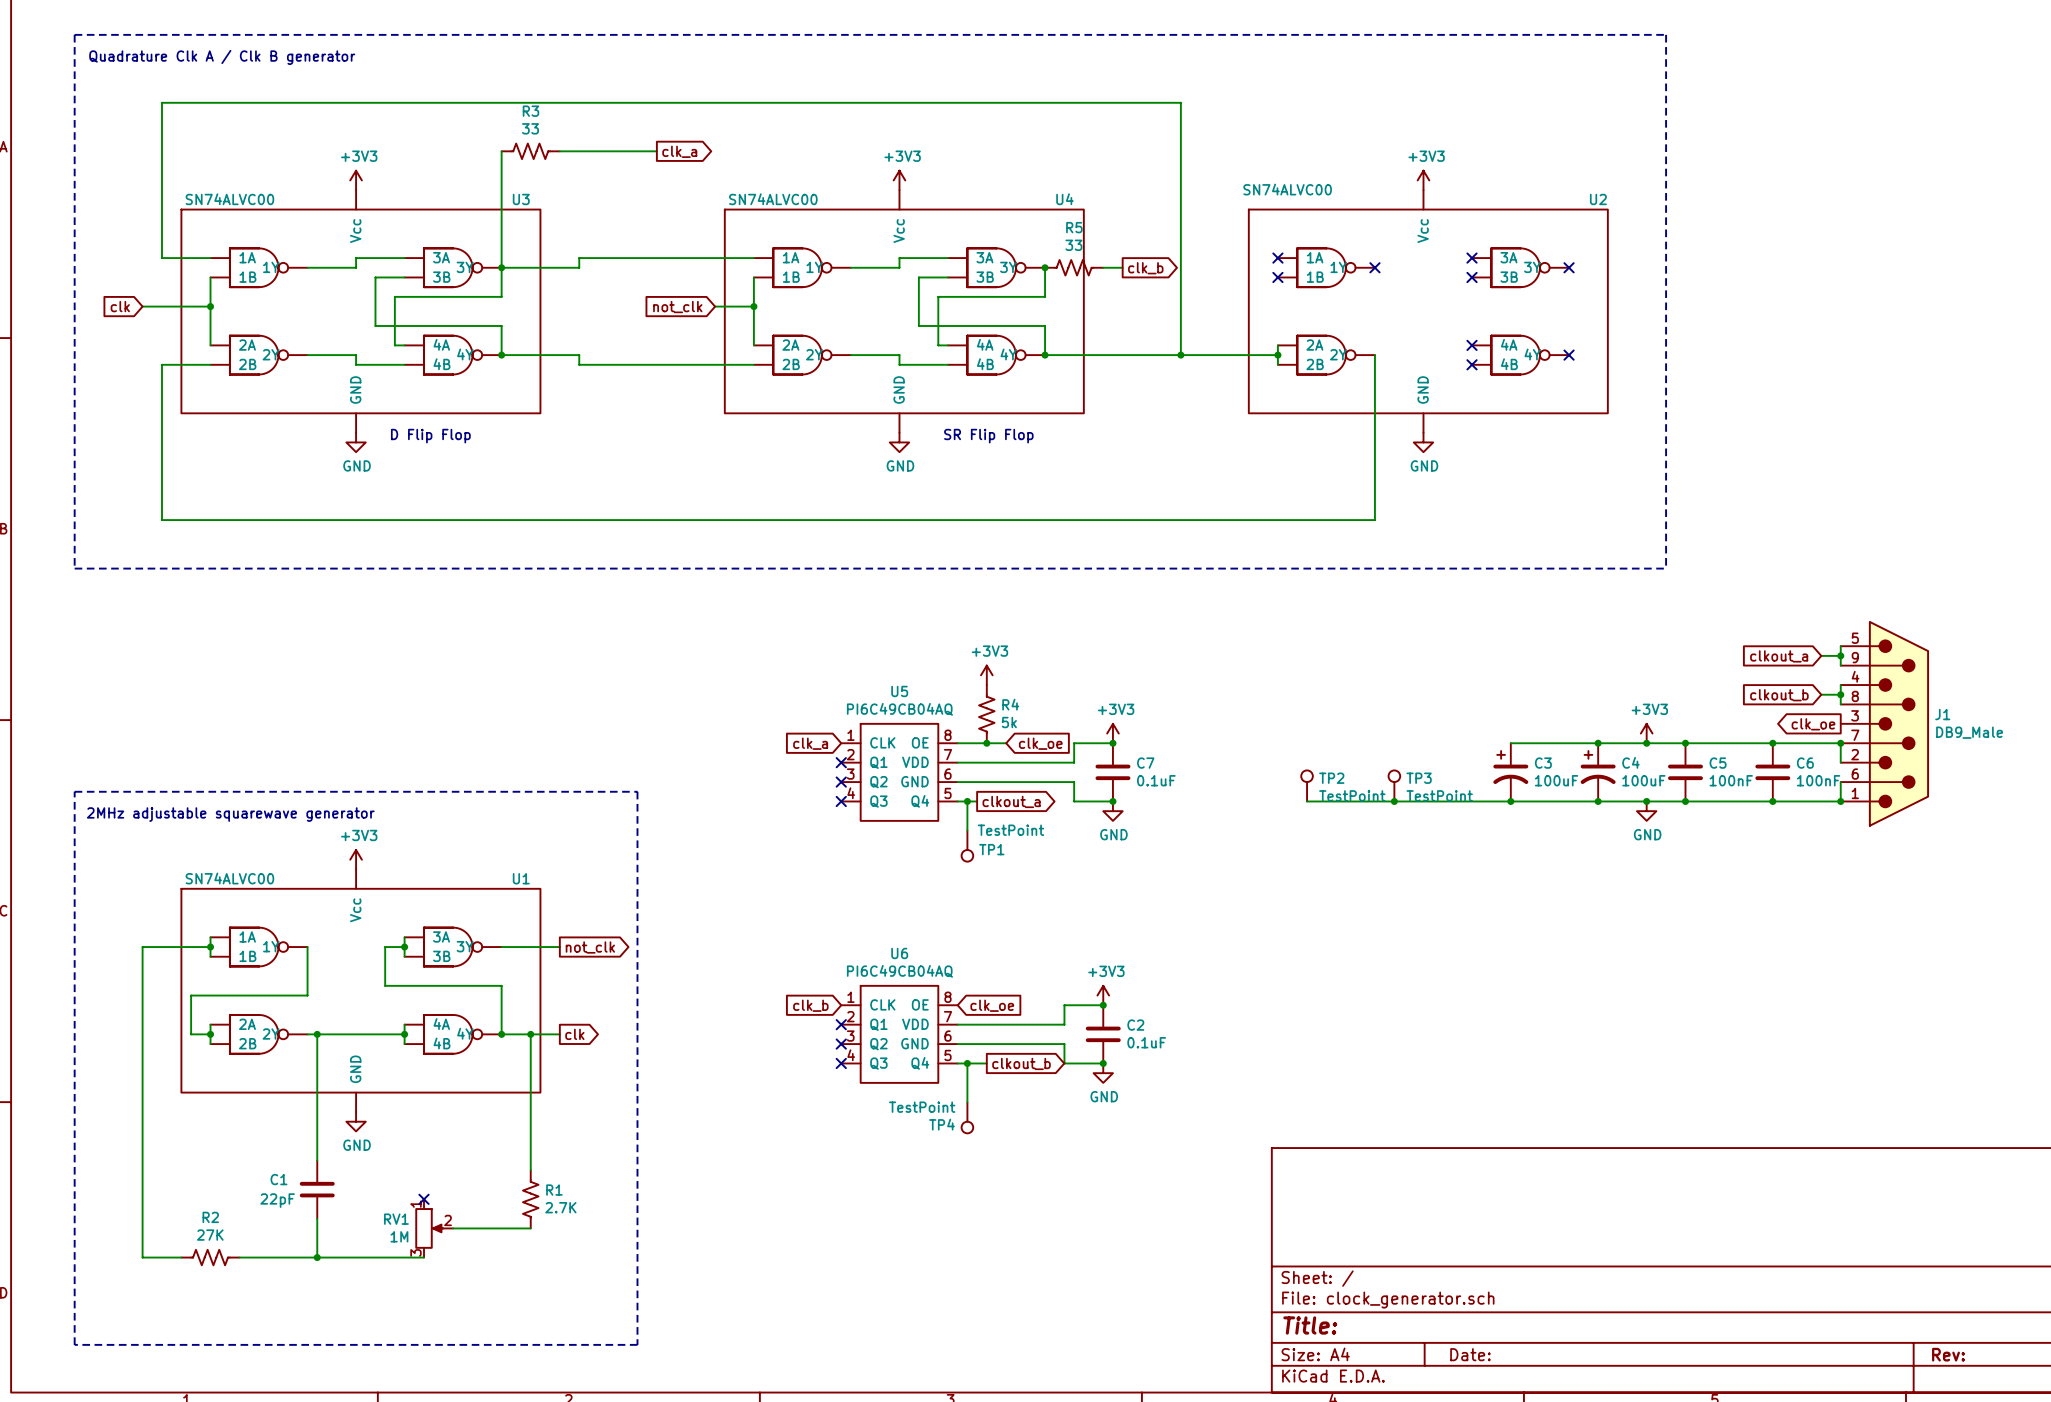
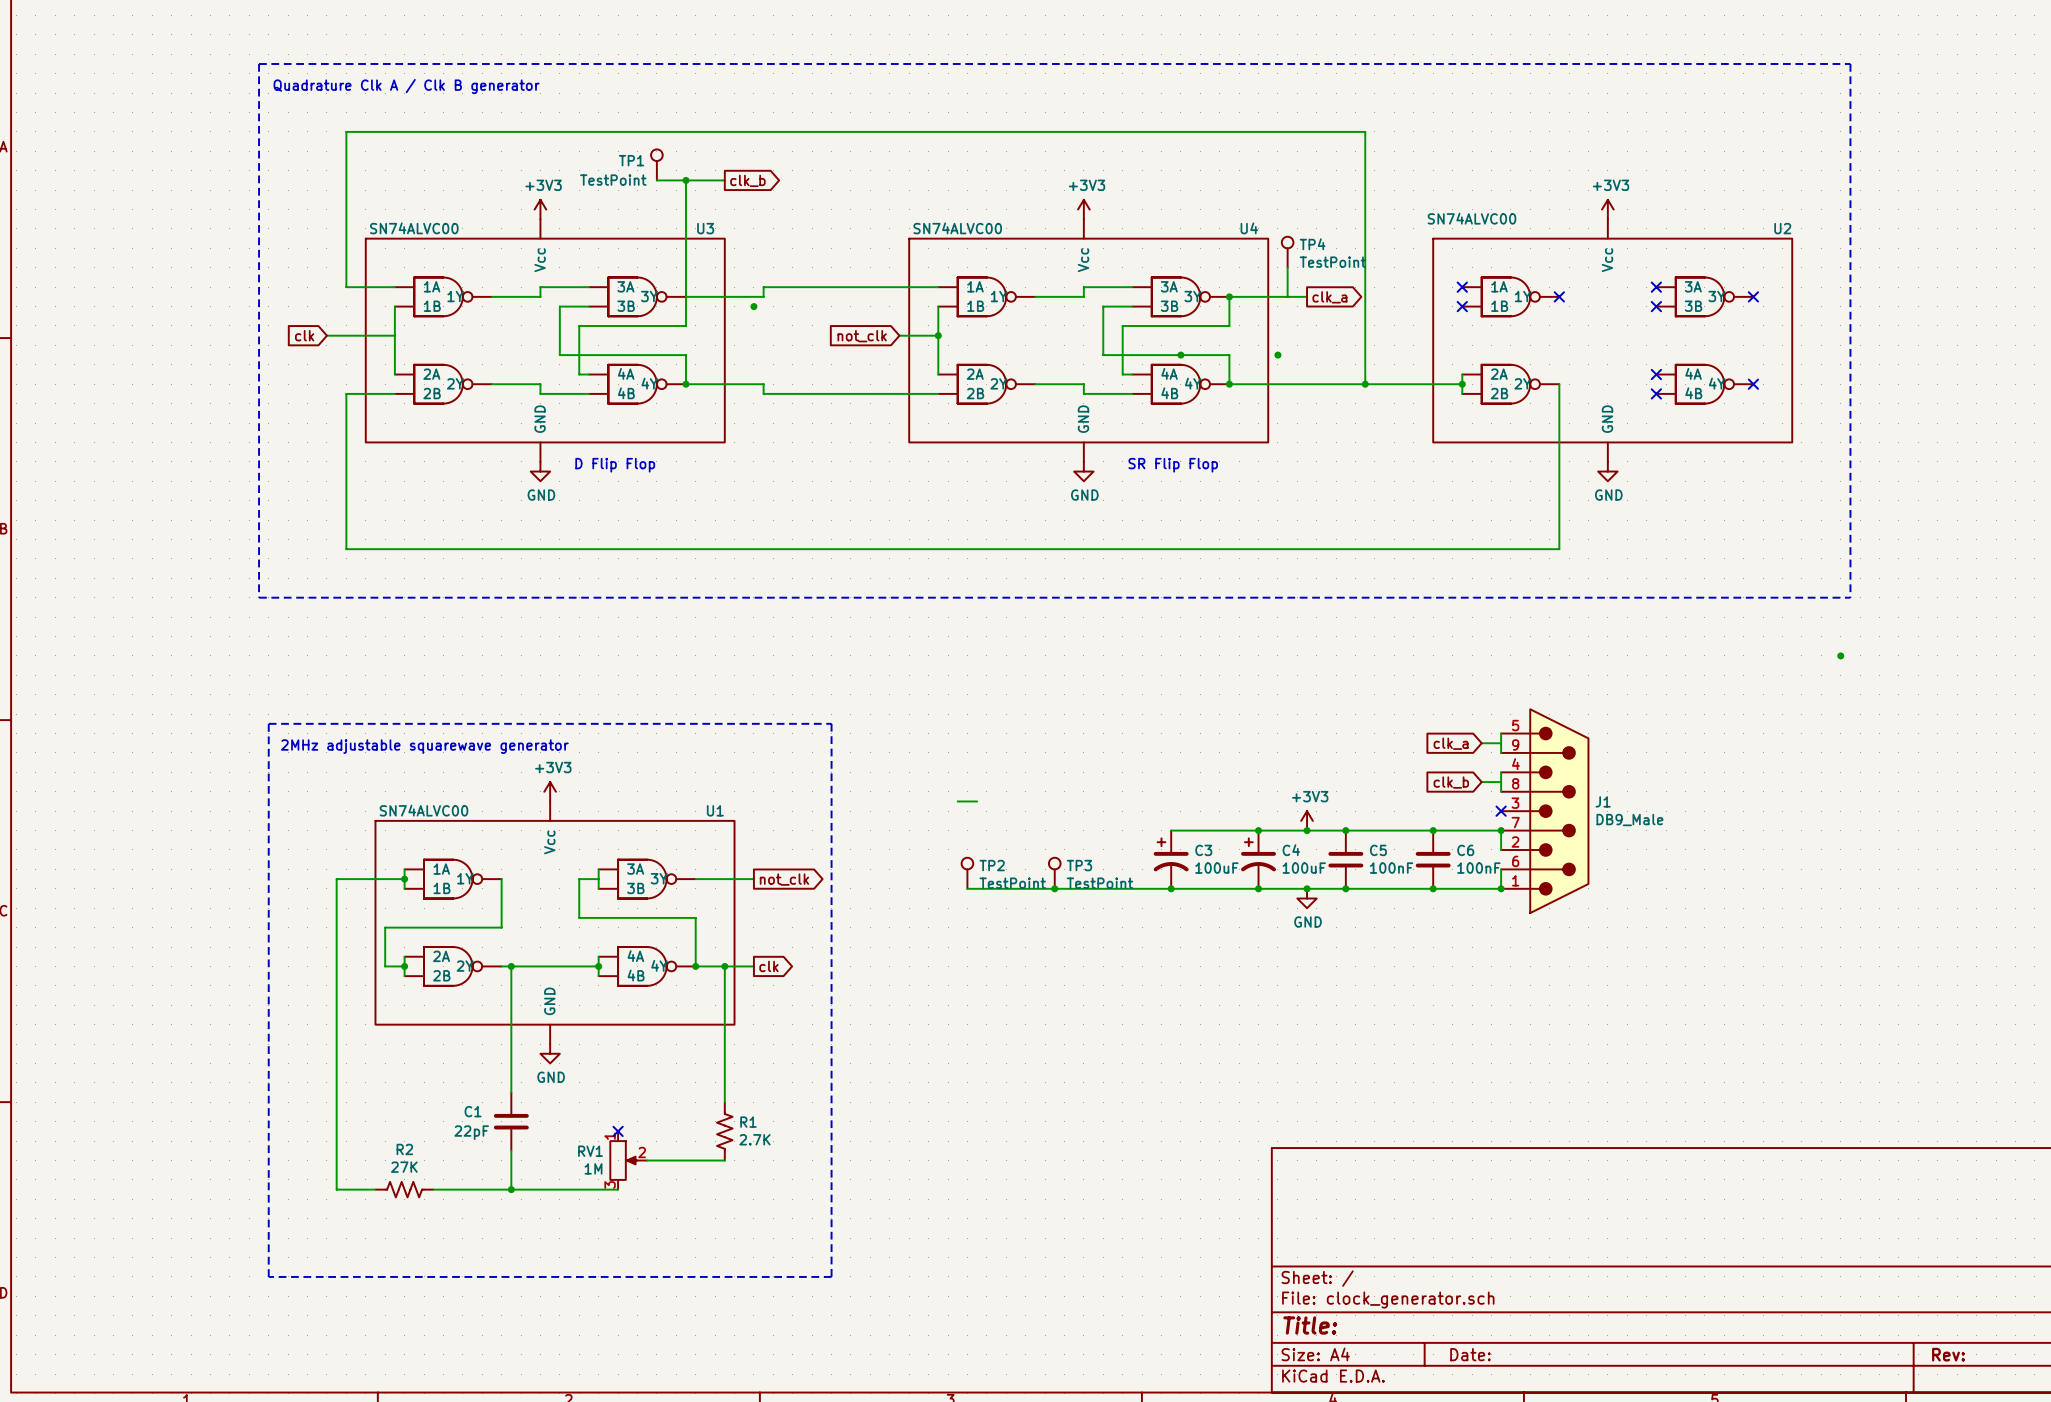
line: (74, 34) (74, 568) (1666, 568) (1666, 34) (74, 34) -> (259, 63) (259, 597) (1850, 597) (1850, 63) (259, 63)
text position: Quadrature Clk A / Clk B generator (222, 57) -> Quadrature Clk A / Clk B generator (406, 86)
wire: (501, 151) (501, 296) -> (588, 287) (540, 287) (540, 296) (501, 296)
R3: 33 (530, 151) -> none
wire: (559, 151) (656, 151) -> none
global label: clk_a (679, 151) -> none
power symbol: +3V3 (356, 180) -> none
wire: none -> (656, 180) (724, 180)
wire: none -> (686, 180) (686, 325) (579, 325) (579, 355) (686, 355) (686, 384) (763, 384) (763, 393) (938, 393)
junction: none -> (686, 180)
global label: none -> clk_b (747, 180)
power symbol: +3V3 (899, 180) -> none
power symbol: +3V3 (1423, 180) -> none
power symbol: none -> +3V3 (540, 209)
power symbol: none -> +3V3 (1083, 209)
power symbol: none -> +3V3 (1607, 209)
wire: (210, 258) (161, 258) (161, 102) (1180, 102) (1180, 355) -> (394, 287) (346, 287) (346, 131) (1365, 131) (1365, 384)
wire: (404, 258) (356, 258) (356, 267) (307, 267) -> none
wire: (753, 258) (579, 258) (579, 267) (501, 267) -> (938, 287) (763, 287) (763, 296) (686, 296)
wire: (948, 258) (899, 258) (899, 267) (850, 267) -> none
no-connect mark: (1277, 258) -> none
no-connect mark: (1472, 258) -> none
junction: (501, 267) -> none
wire: (1045, 267) (1045, 296) -> (1132, 287) (1083, 287) (1083, 296) (1045, 296)
junction: (1045, 267) -> none
R5: 33 (1074, 267) -> none
wire: (1103, 267) (1122, 267) -> none
wire: none -> (1287, 267) (1287, 296)
no-connect mark: (1374, 267) -> none
no-connect mark: (1569, 267) -> none
global label: clk_b (1145, 268) -> none
wire: (210, 277) (210, 345) -> none
wire: (404, 277) (375, 277) (375, 325) (501, 325) (501, 355) (559, 355) -> (588, 306) (559, 306) (559, 355)
wire: (753, 277) (753, 345) -> none
wire: (948, 277) (918, 277) (918, 325) (1045, 325) (1045, 355) (1103, 355) -> (1132, 306) (1103, 306) (1103, 355)
no-connect mark: (1277, 277) -> none
no-connect mark position: (1472, 277) -> (1462, 287)
no-connect mark: none -> (1656, 287)
wire: (491, 296) (394, 296) (394, 306) -> none
wire: (1035, 296) (938, 296) (938, 306) -> none
junction: none -> (1229, 296)
wire: none -> (1307, 296) (1229, 296) (1229, 325) (1122, 325) (1122, 374) (1132, 374)
no-connect mark: none -> (1559, 296)
no-connect mark: none -> (1753, 296)
global label: none -> clk_a (1329, 297)
global label position: clk (120, 306) -> clk (304, 335)
wire: (142, 306) (210, 306) -> (326, 335) (394, 335)
junction: (210, 306) -> none
wire: (715, 306) (753, 306) -> (899, 335) (938, 335)
no-connect mark: none -> (1462, 306)
no-connect mark: none -> (1656, 306)
global label position: not_clk (677, 307) -> not_clk (862, 336)
U3 position: (360, 311) -> (545, 340)
U4 position: (904, 311) -> (1088, 340)
U2 position: (1428, 311) -> (1612, 340)
junction: none -> (938, 335)
wire: (394, 345) (404, 345) -> (394, 345) (394, 374)
wire: (938, 345) (948, 345) -> (938, 345) (938, 374)
wire: (1277, 345) (1277, 364) -> (1462, 374) (1462, 393)
no-connect mark: (1472, 345) -> none
wire: (307, 355) (356, 355) (356, 364) (404, 364) -> (491, 384) (540, 384) (540, 393) (588, 393)
junction: (501, 355) -> none
wire: (850, 355) (899, 355) (899, 364) (948, 364) -> (1035, 384) (1083, 384) (1083, 393) (1132, 393)
junction: (1045, 355) -> none
wire: (1229, 355) (1277, 355) -> (1229, 355) (1229, 384) (1462, 384)
wire: (1374, 355) (1374, 520) (161, 520) (161, 364) (210, 364) -> (1559, 384) (1559, 549) (346, 549) (346, 393) (394, 393)
no-connect mark: (1569, 355) -> none
wire: (579, 364) (753, 364) -> (579, 364) (579, 374) (588, 374)
no-connect mark: (1472, 364) -> none
no-connect mark: none -> (1656, 374)
junction: none -> (686, 384)
junction: none -> (1229, 384)
junction: none -> (1365, 384)
junction: none -> (1462, 384)
no-connect mark: none -> (1753, 384)
no-connect mark: none -> (1656, 393)
text position: D Flip Flop (430, 436) -> D Flip Flop (615, 465)
text position: SR Flip Flop (988, 436) -> SR Flip Flop (1173, 465)
power symbol: GND (356, 442) -> none
power symbol: GND (899, 442) -> none
power symbol: GND (1423, 442) -> none
power symbol: none -> GND (540, 471)
power symbol: none -> GND (1083, 471)
power symbol: none -> GND (1607, 471)
wire: (1840, 646) (1840, 665) -> none
wire: (1821, 655) (1840, 655) -> none
global label: clkout_a (1779, 656) -> none
power symbol: +3V3 (986, 675) -> none
wire: (1840, 685) (1840, 704) -> none
wire: (1821, 694) (1840, 694) -> none
junction: (1840, 694) -> none
global label: clkout_b (1779, 695) -> none
R4: 5k (986, 714) -> none
line: none -> (268, 723) (268, 1276) (831, 1276) (831, 723) (268, 723)
J1 position: (1884, 723) -> (1545, 811)
global label: clk_oe (1813, 724) -> none
power symbol: +3V3 (1112, 733) -> none
wire: none -> (1501, 733) (1501, 752)
power symbol: +3V3 (1646, 733) -> none
global label: clk_a (810, 743) -> none
wire: (957, 743) (1006, 743) -> none
junction: (986, 743) -> none
global label: clk_oe (1040, 743) -> none
wire: (1112, 743) (1074, 743) (1074, 762) (957, 762) -> none
junction: (1112, 743) -> none
global label: none -> clk_a (1451, 743)
wire: none -> (1481, 743) (1501, 743)
wire: (1510, 743) (1840, 743) (1840, 762) -> none
junction: (1598, 743) -> none
junction: (1646, 743) -> none
junction: (1685, 743) -> none
junction: (1772, 743) -> none
junction: (1840, 743) -> none
text: none -> 2MHz adjustable squarewave generator (424, 746)
no-connect mark: (841, 762) -> none
U5: PI6C49CB04AQ (899, 772) -> none
C7: 0.1uF (1112, 772) -> none
wire: none -> (1501, 772) (1501, 791)
C3 position: (1510, 772) -> (1171, 859)
C4 position: (1598, 772) -> (1258, 859)
C5 position: (1685, 772) -> (1345, 859)
C6 position: (1772, 772) -> (1433, 859)
no-connect mark: (841, 782) -> none
wire: (957, 782) (1074, 782) (1074, 801) (1112, 801) -> none
global label: none -> clk_b (1451, 782)
wire: none -> (1481, 782) (1501, 782)
wire: (1840, 782) (1840, 801) (1307, 801) -> none
TP2 position: (1307, 785) -> (967, 873)
TP3 position: (1394, 785) -> (1054, 873)
line: (74, 791) (74, 1344) (637, 1344) (637, 791) (74, 791) -> none
power symbol: none -> +3V3 (550, 791)
no-connect mark: (841, 801) -> none
wire: (967, 801) (967, 830) -> none
junction: (967, 801) -> none
global label: clkout_a (1011, 801) -> none
junction: (1112, 801) -> none
junction: (1394, 801) -> none
junction position: (1510, 801) -> (1501, 830)
junction: (1598, 801) -> none
junction: (1646, 801) -> none
junction: (1685, 801) -> none
junction: (1772, 801) -> none
junction: (1840, 801) -> none
power symbol: GND (1112, 811) -> none
no-connect mark: none -> (1501, 811)
power symbol: GND (1646, 811) -> none
text: 2MHz adjustable squarewave generator (230, 814) -> none
power symbol: none -> +3V3 (1307, 820)
wire: none -> (1171, 830) (1501, 830) (1501, 849)
junction: none -> (1258, 830)
junction: none -> (1307, 830)
junction: none -> (1345, 830)
junction: none -> (1433, 830)
TP1 position: (967, 846) -> (656, 164)
TP1 rotation: 0° (967, 855) -> 180° (656, 155)
power symbol: +3V3 (356, 859) -> none
wire: none -> (598, 869) (598, 888)
wire: none -> (1501, 869) (1501, 888) (967, 888)
wire: none -> (404, 879) (336, 879) (336, 1189) (375, 1189)
junction: none -> (404, 879)
wire: none -> (598, 879) (579, 879) (579, 917) (695, 917) (695, 966) (753, 966)
wire: none -> (695, 879) (753, 879)
global label: none -> not_clk (784, 879)
junction: none -> (1054, 888)
junction: none -> (1171, 888)
junction: none -> (1258, 888)
junction: none -> (1307, 888)
junction: none -> (1345, 888)
junction: none -> (1433, 888)
junction: none -> (1501, 888)
power symbol: none -> GND (1307, 898)
wire: (210, 937) (210, 956) -> none
wire: (404, 937) (404, 956) -> (404, 976) (404, 956)
wire: (210, 947) (142, 947) (142, 1257) (181, 1257) -> none
junction: (210, 947) -> none
wire: (307, 947) (307, 995) (191, 995) (191, 1034) (210, 1034) -> none
wire: (385, 947) (404, 947) -> (385, 947) (385, 927) (501, 927) (501, 879)
junction position: (404, 947) -> (404, 966)
wire: (501, 947) (559, 947) -> none
global label: not_clk (590, 947) -> none
wire: none -> (598, 956) (598, 976)
wire: (385, 966) (385, 985) (501, 985) (501, 1034) (559, 1034) -> (385, 966) (404, 966)
wire: none -> (501, 966) (598, 966)
wire: none -> (511, 966) (511, 1092)
junction: none -> (511, 966)
junction: none -> (598, 966)
junction: none -> (695, 966)
wire: none -> (724, 966) (724, 1102)
junction: none -> (724, 966)
global label: none -> clk (768, 966)
U1 position: (360, 990) -> (555, 922)
power symbol: +3V3 (1103, 995) -> none
global label: clk_b (810, 1005) -> none
global label: clk_oe (992, 1005) -> none
wire: (1103, 1005) (1064, 1005) (1064, 1024) (957, 1024) -> none
junction: (1103, 1005) -> none
wire: (210, 1024) (210, 1044) -> none
wire: (404, 1024) (404, 1044) -> (404, 869) (404, 888)
no-connect mark: (841, 1024) -> none
junction: (210, 1034) -> none
wire: (307, 1034) (404, 1034) -> none
wire: (317, 1034) (317, 1160) -> none
junction: (317, 1034) -> none
junction: (404, 1034) -> none
junction: (501, 1034) -> none
wire: (530, 1034) (530, 1170) -> none
junction: (530, 1034) -> none
global label: clk (574, 1034) -> none
U6: PI6C49CB04AQ (899, 1034) -> none
C2: 0.1uF (1103, 1034) -> none
no-connect mark: (841, 1044) -> none
wire: (957, 1044) (1064, 1044) (1064, 1063) (1103, 1063) -> none
power symbol: none -> GND (550, 1053)
no-connect mark: (841, 1063) -> none
wire: (957, 1063) (986, 1063) -> none
wire: (967, 1063) (967, 1102) -> none
junction: (967, 1063) -> none
global label: clkout_b (1021, 1063) -> none
junction: (1103, 1063) -> none
power symbol: GND (1103, 1073) -> none
TP4 position: (967, 1117) -> (1287, 252)
power symbol: GND (356, 1121) -> none
TP4 rotation: 0° (967, 1127) -> 180° (1287, 242)
no-connect mark: none -> (618, 1131)
wire: none -> (511, 1150) (511, 1189)
wire: none -> (647, 1160) (724, 1160)
C1 position: (317, 1189) -> (511, 1121)
wire: none -> (433, 1189) (618, 1189)
junction: none -> (511, 1189)
no-connect mark: (424, 1199) -> none
R1 position: (530, 1199) -> (724, 1131)
wire: (317, 1218) (317, 1257) -> none
RV1 position: (434, 1228) -> (628, 1160)
wire: (453, 1228) (530, 1228) -> none
R2 position: (210, 1257) -> (404, 1189)
wire: (239, 1257) (424, 1257) -> none
junction: (317, 1257) -> none

